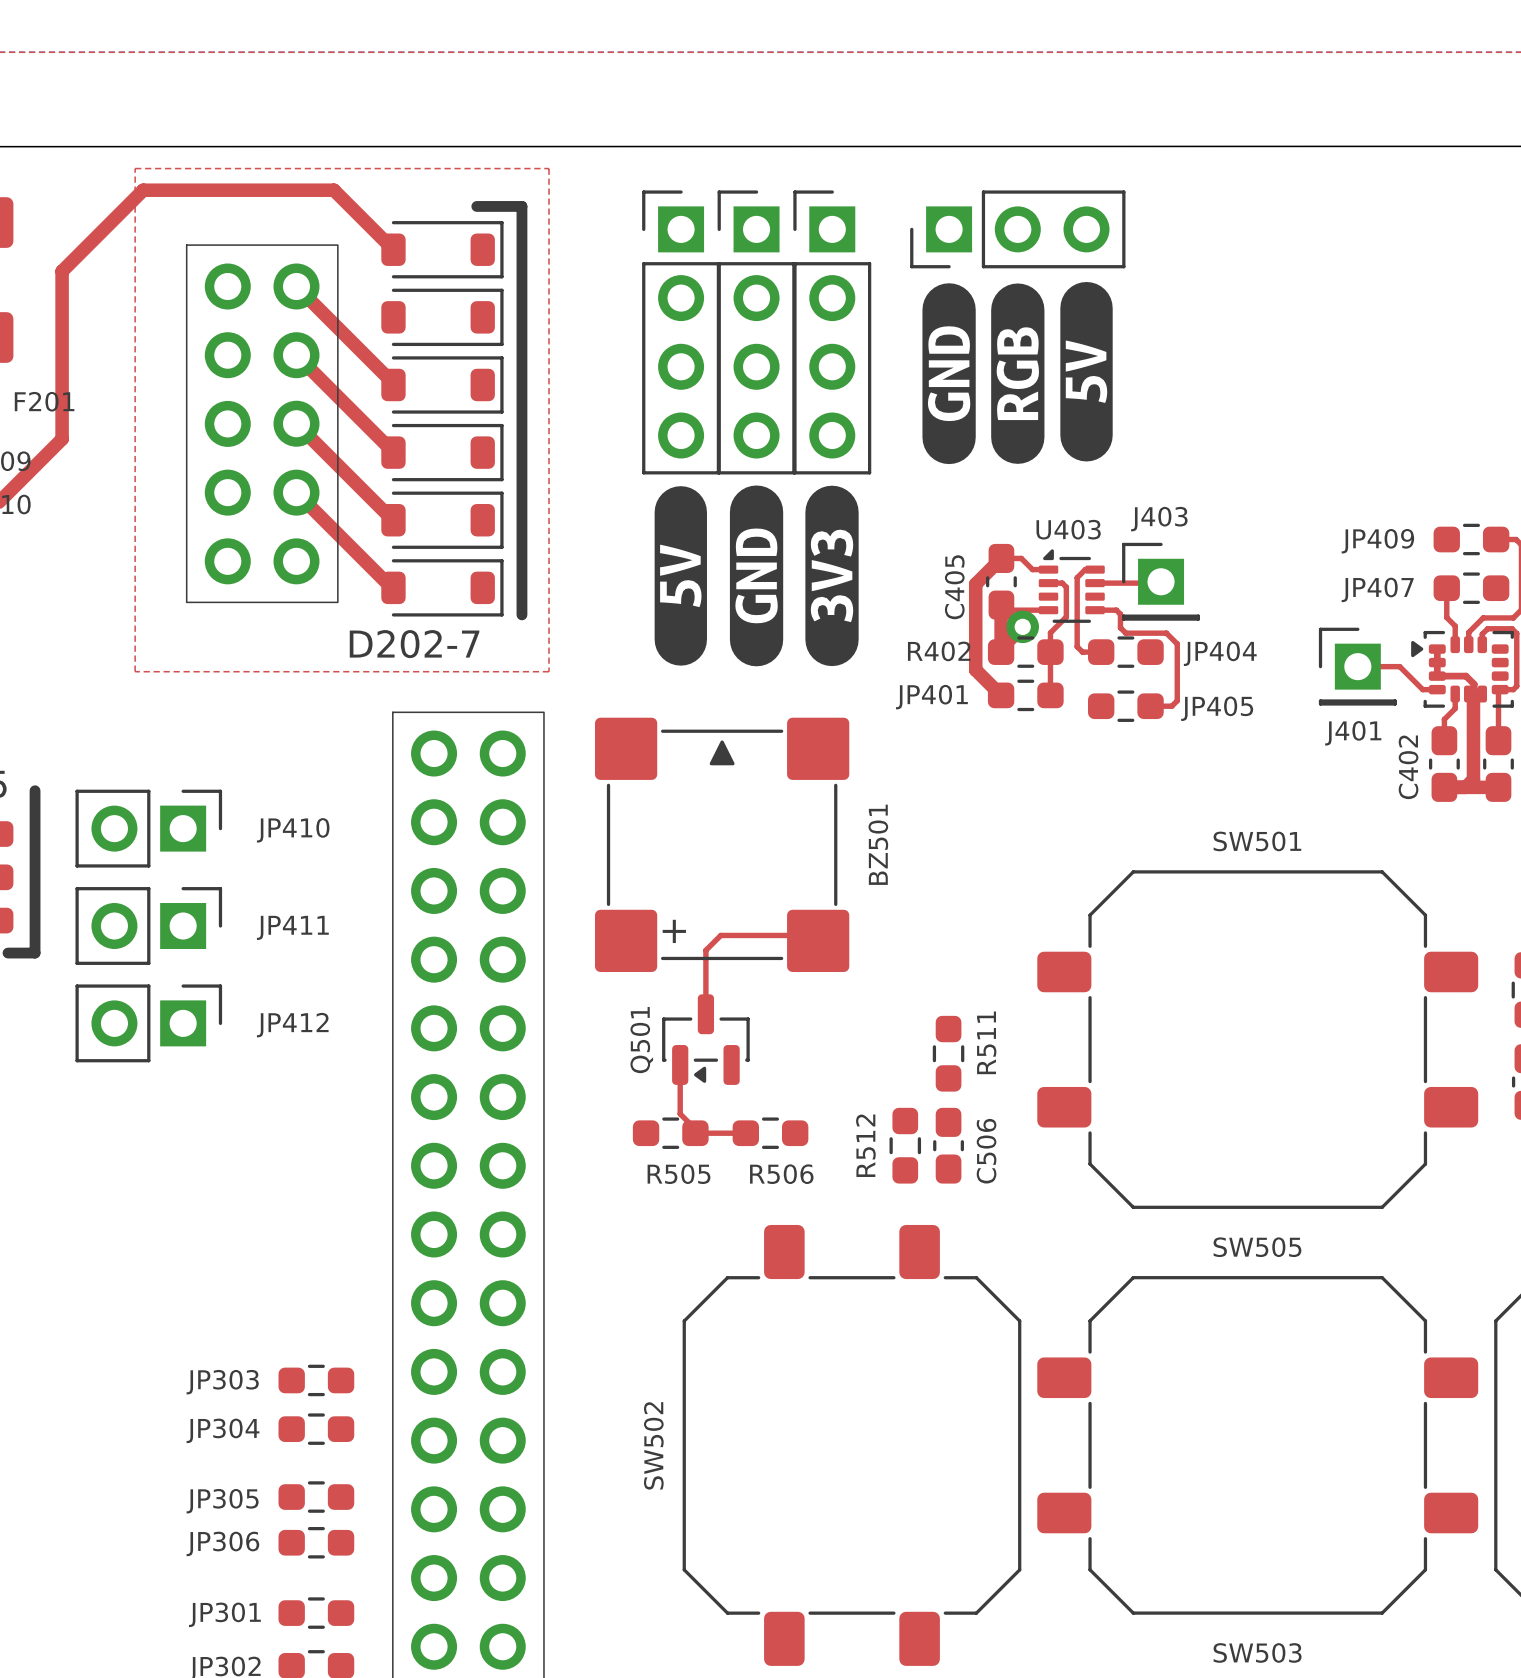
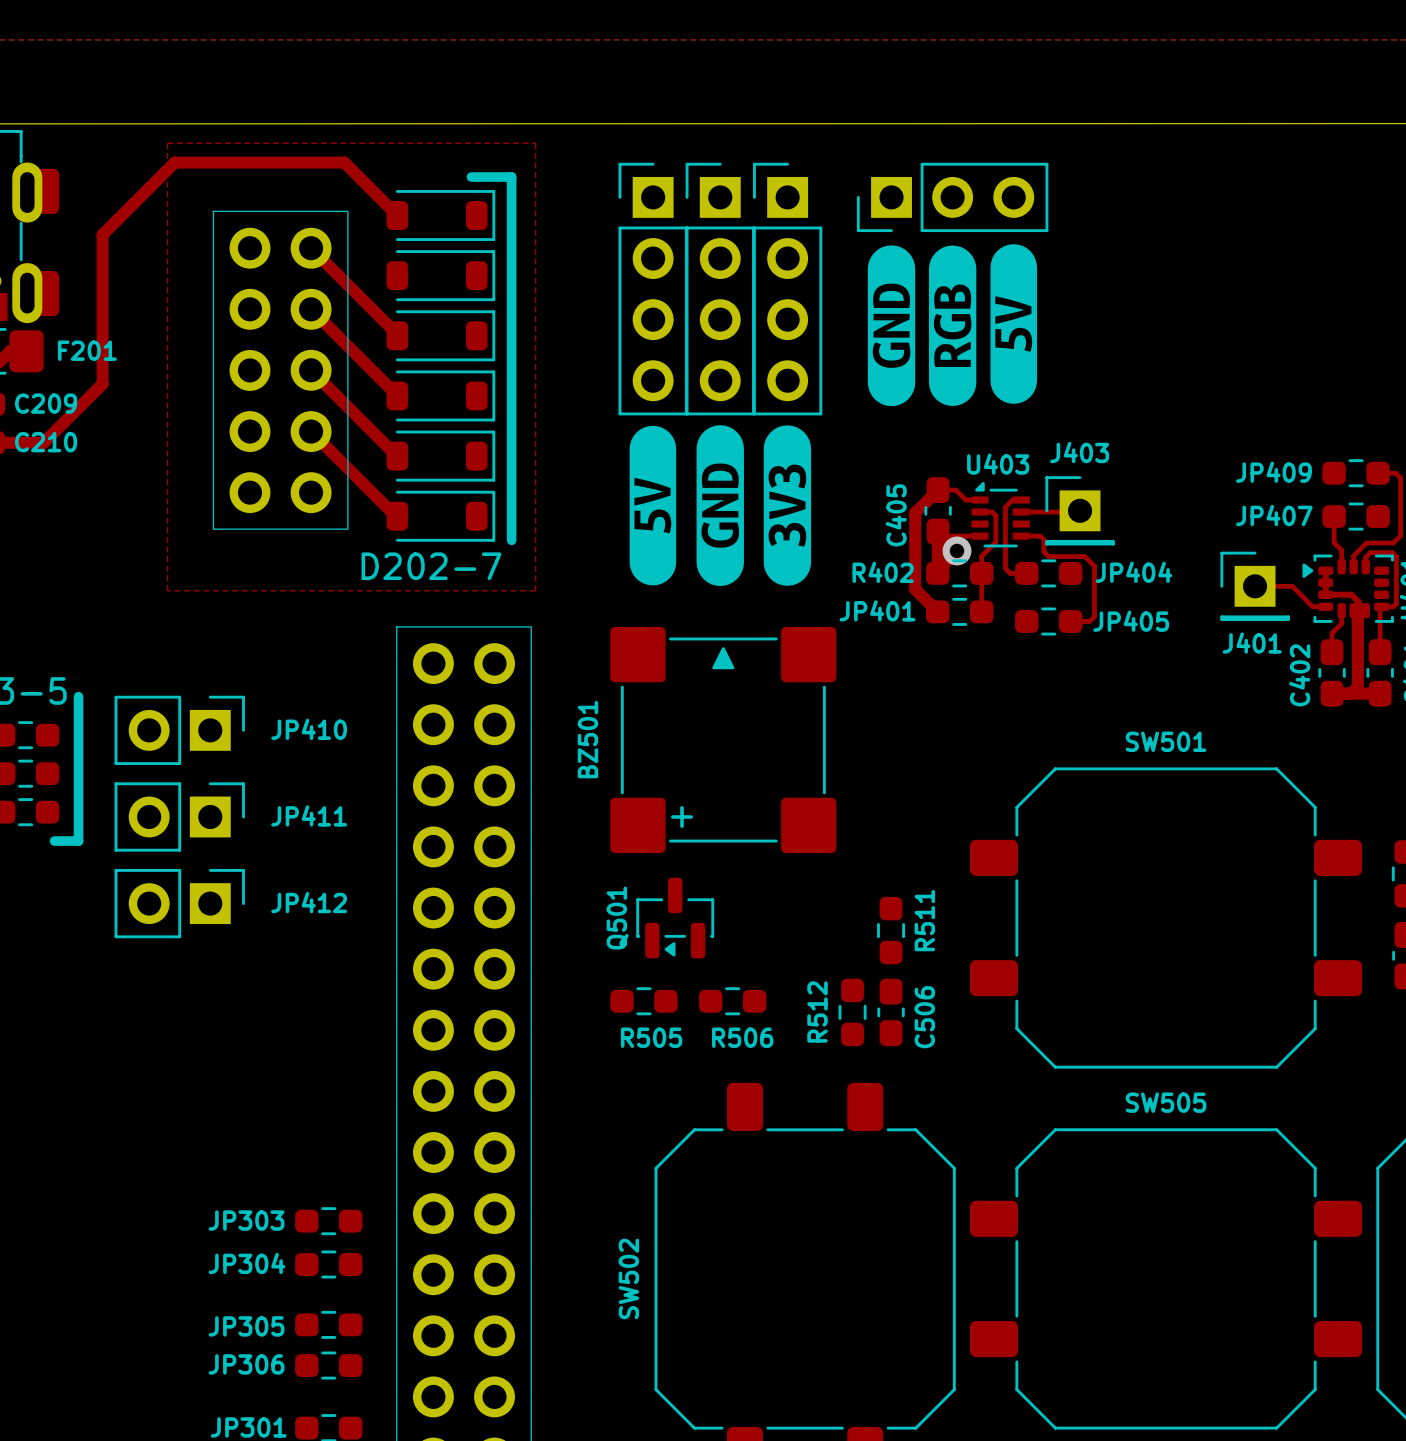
BZ501 position: (722, 844) -> (723, 740)
BZ501 name position: BZ501 (878, 844) -> BZ501 (587, 739)
top track: (818, 940) (812, 935) (720, 935) (705, 950) (705, 1014) -> none
top track: (680, 1064) (680, 1114) (695, 1129) (695, 1133) (745, 1133) -> none

